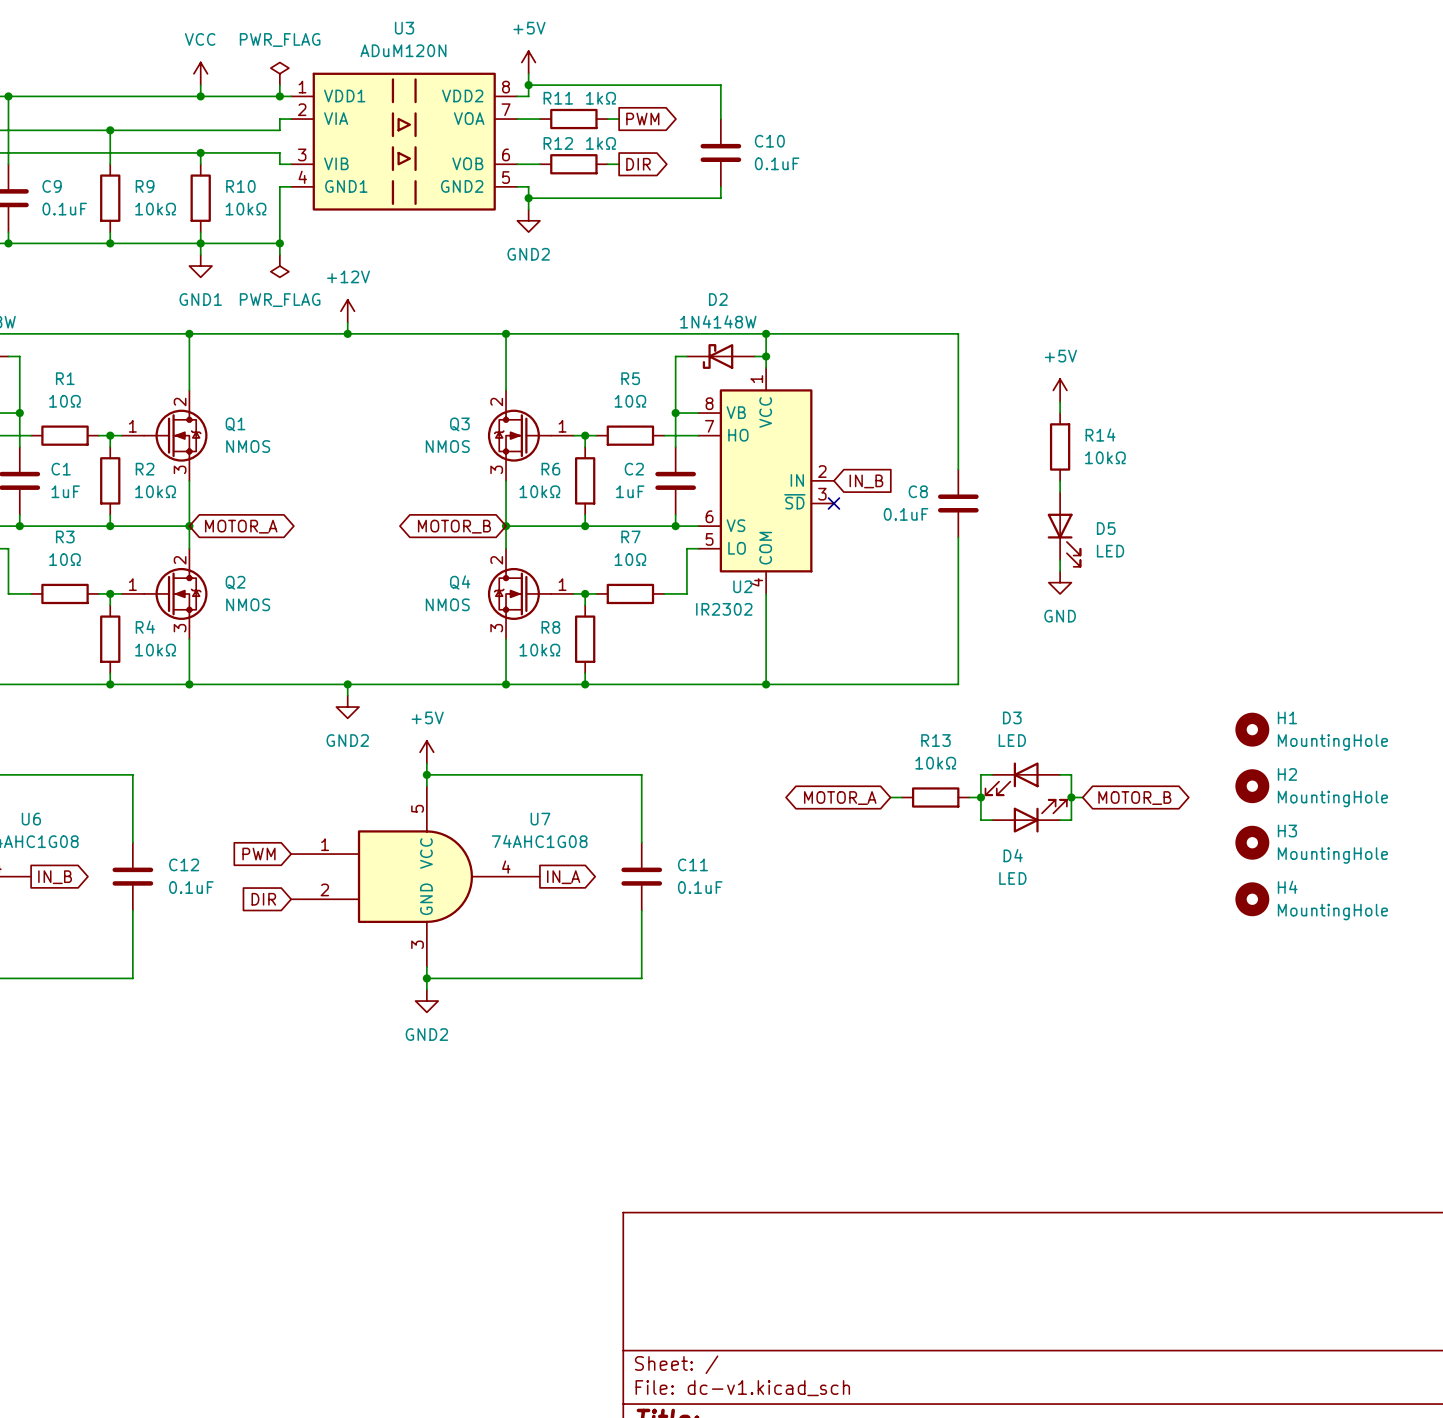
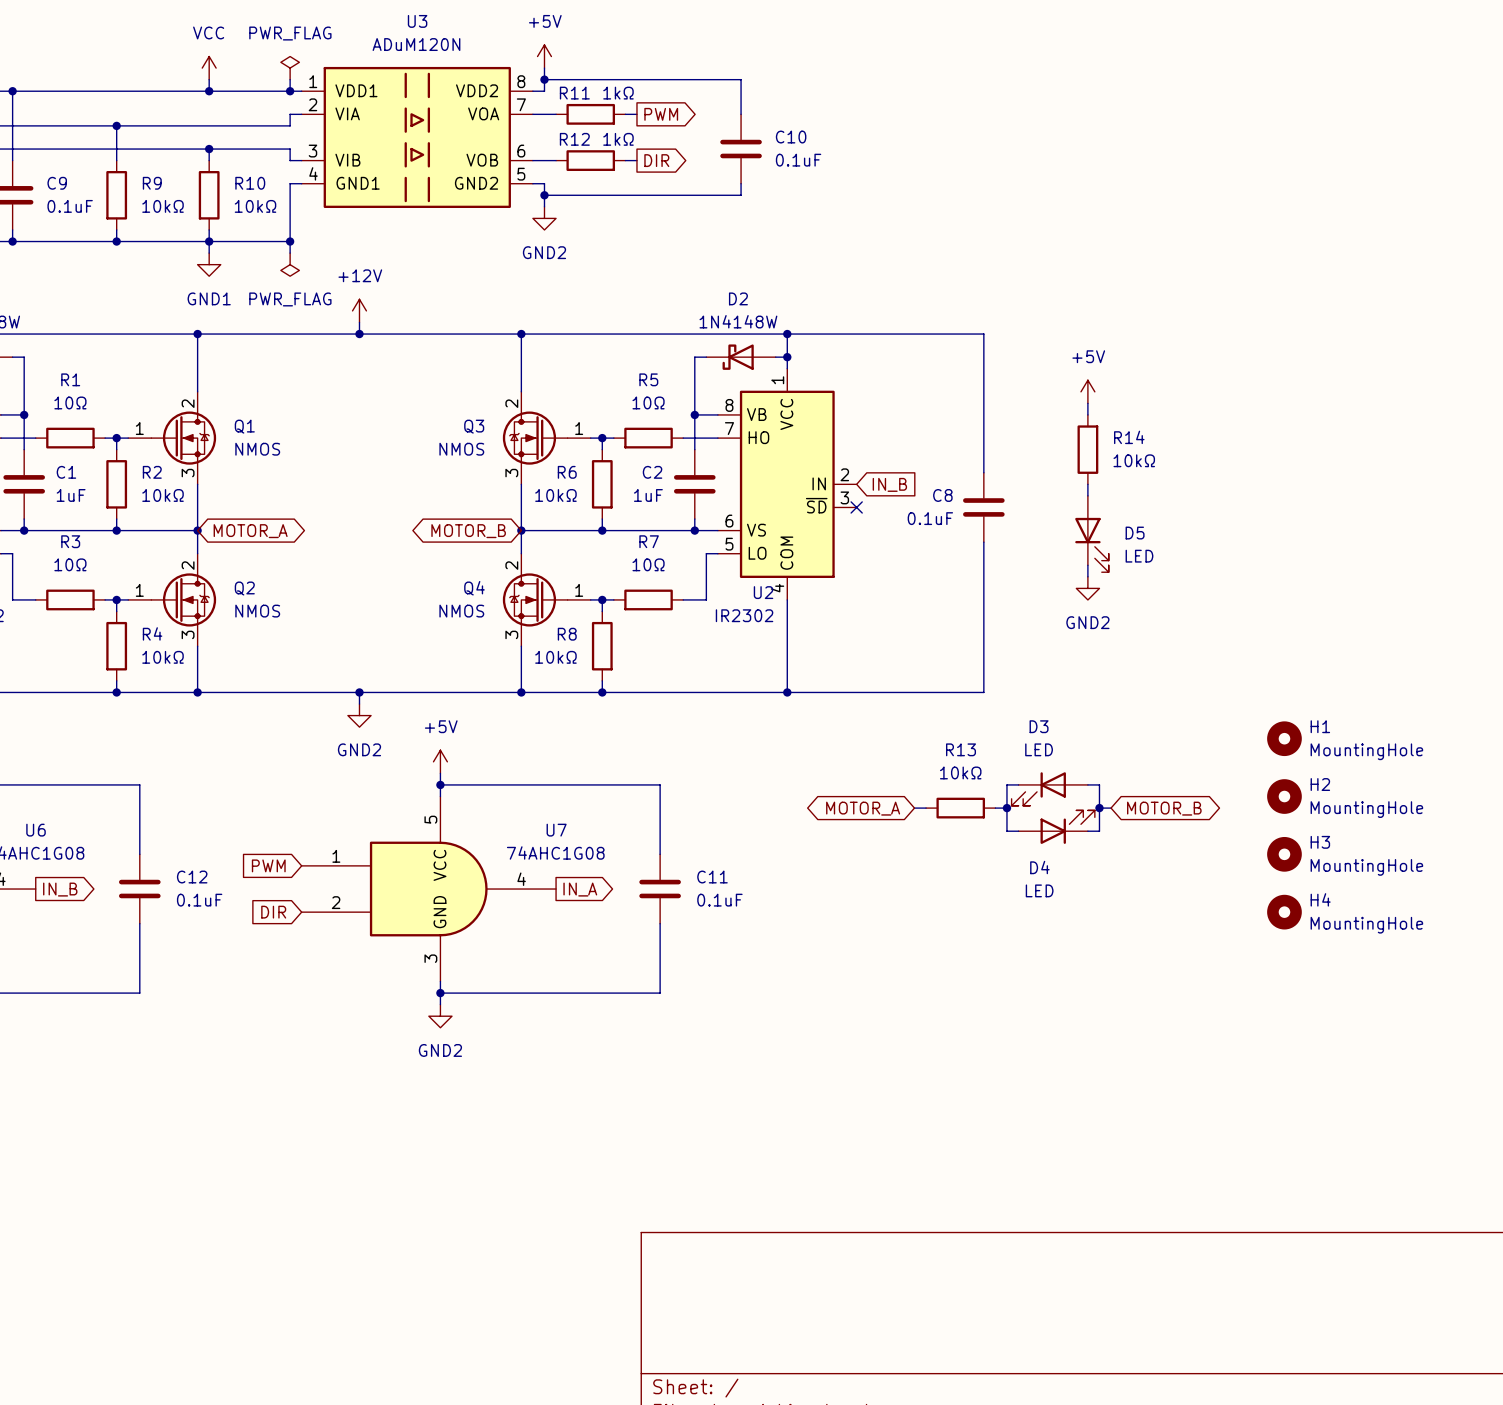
power symbol: GND (1060, 582) -> GND2 (1087, 588)

